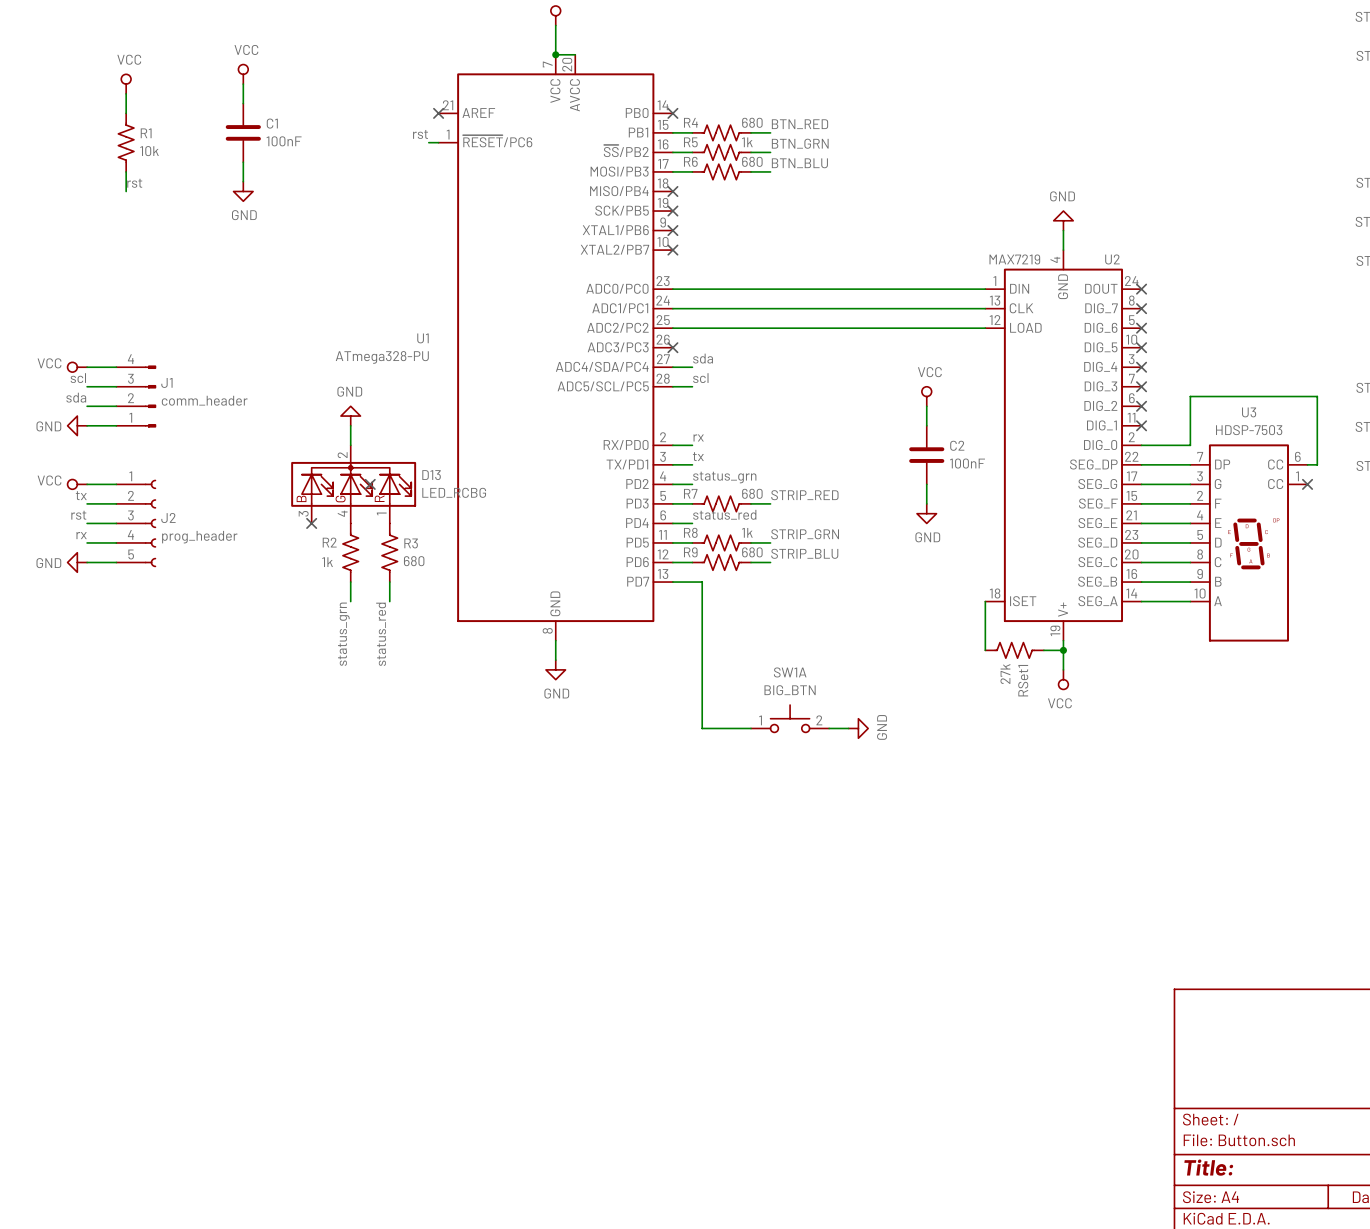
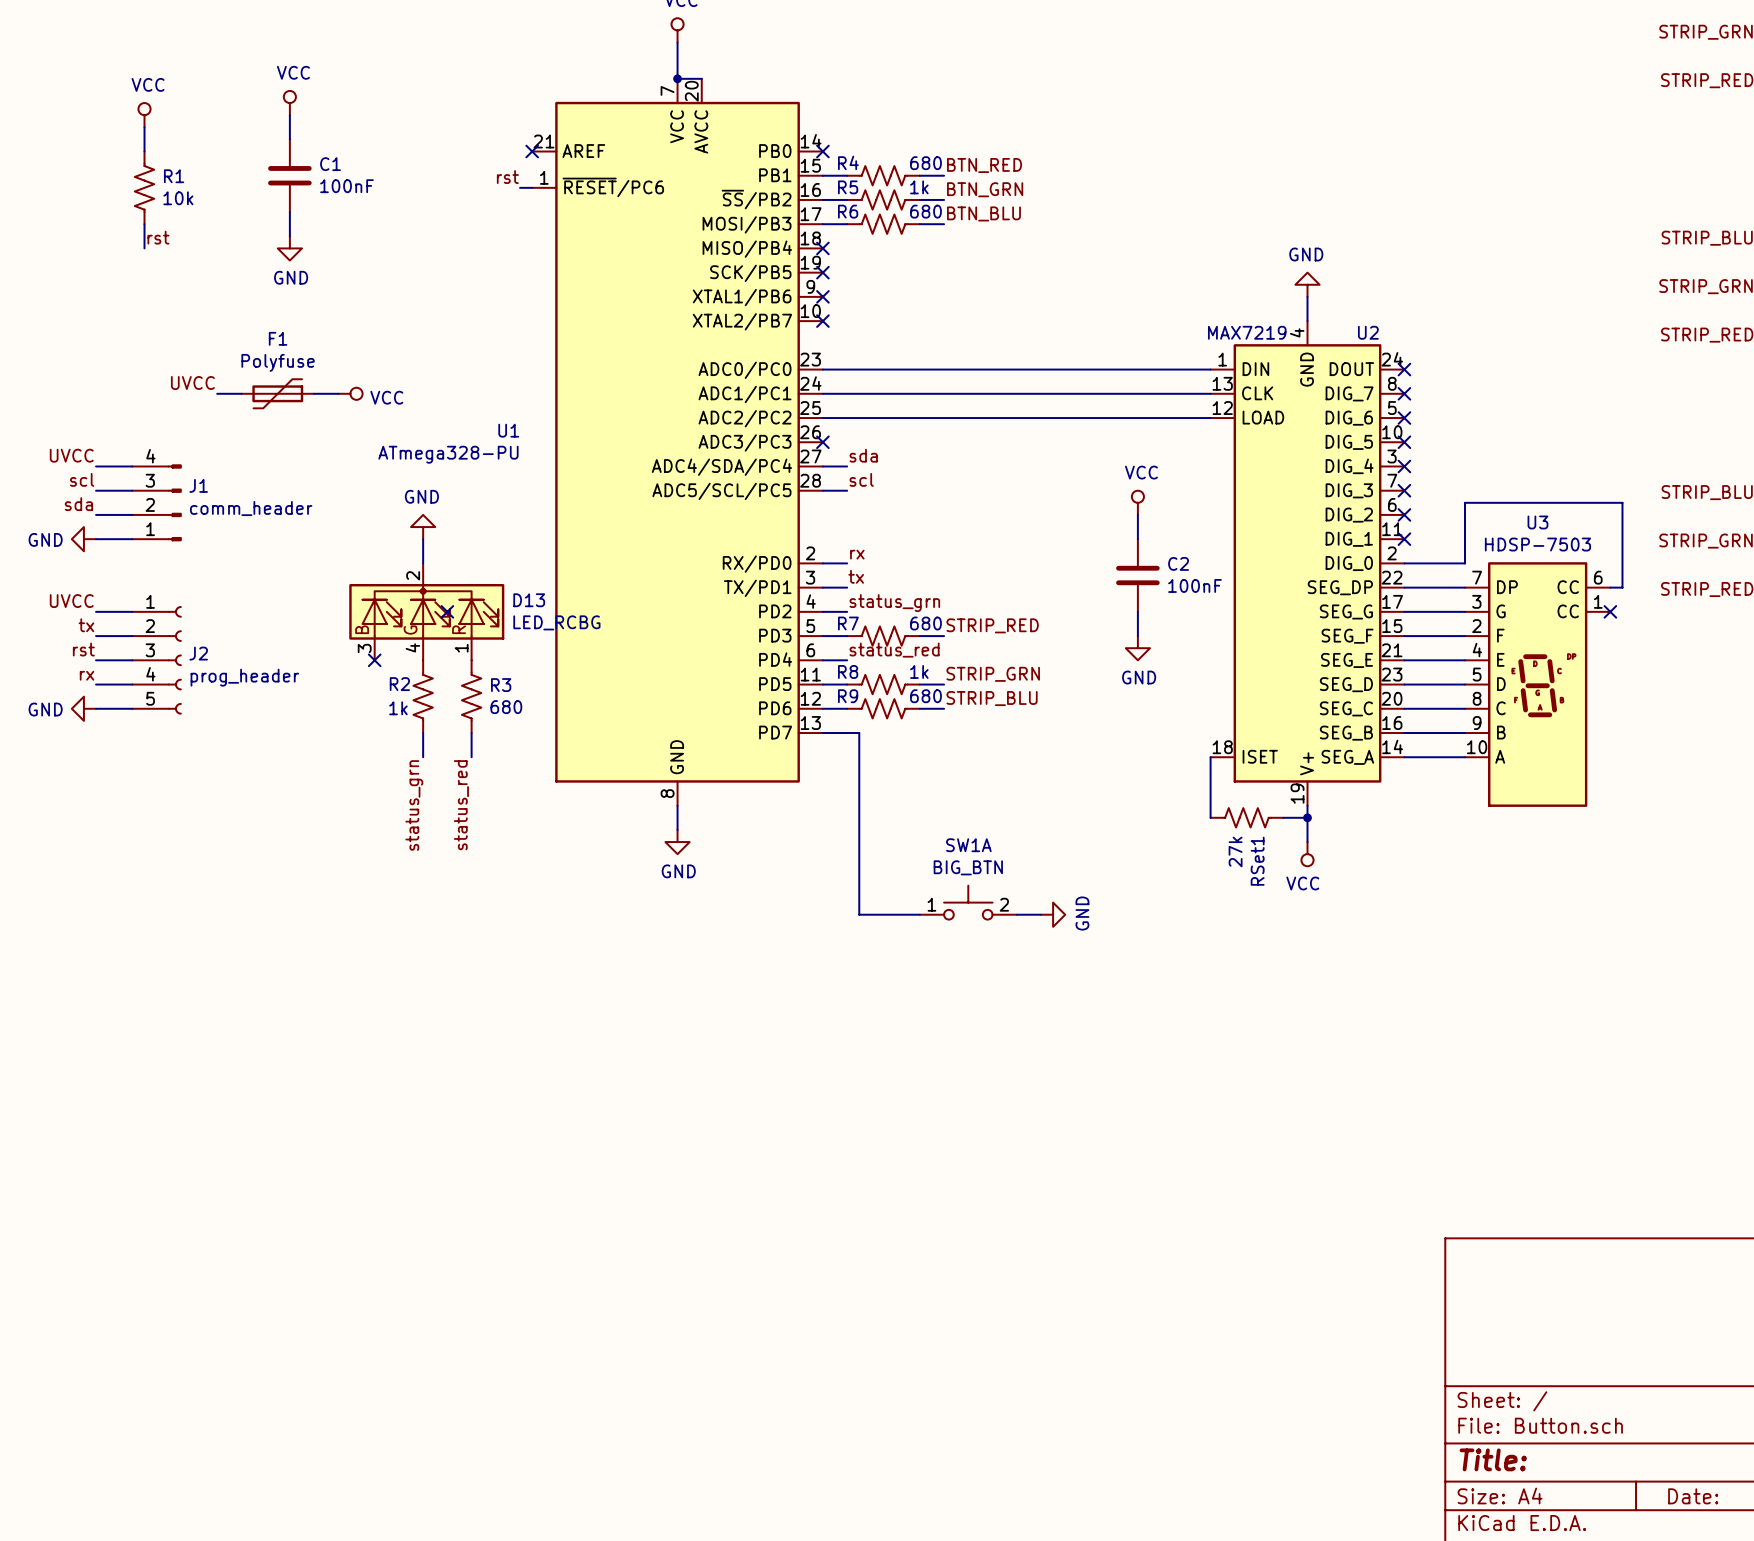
label: none -> UVCC (192, 382)
wire: none -> (217, 393) (241, 393)
F1: none -> Polyfuse (277, 393)
wire: none -> (314, 393) (338, 393)
power symbol: none -> VCC (350, 393)
label: none -> UVCC (71, 455)
power symbol: VCC (77, 367) -> none
label: none -> UVCC (71, 601)
power symbol: VCC (77, 484) -> none

